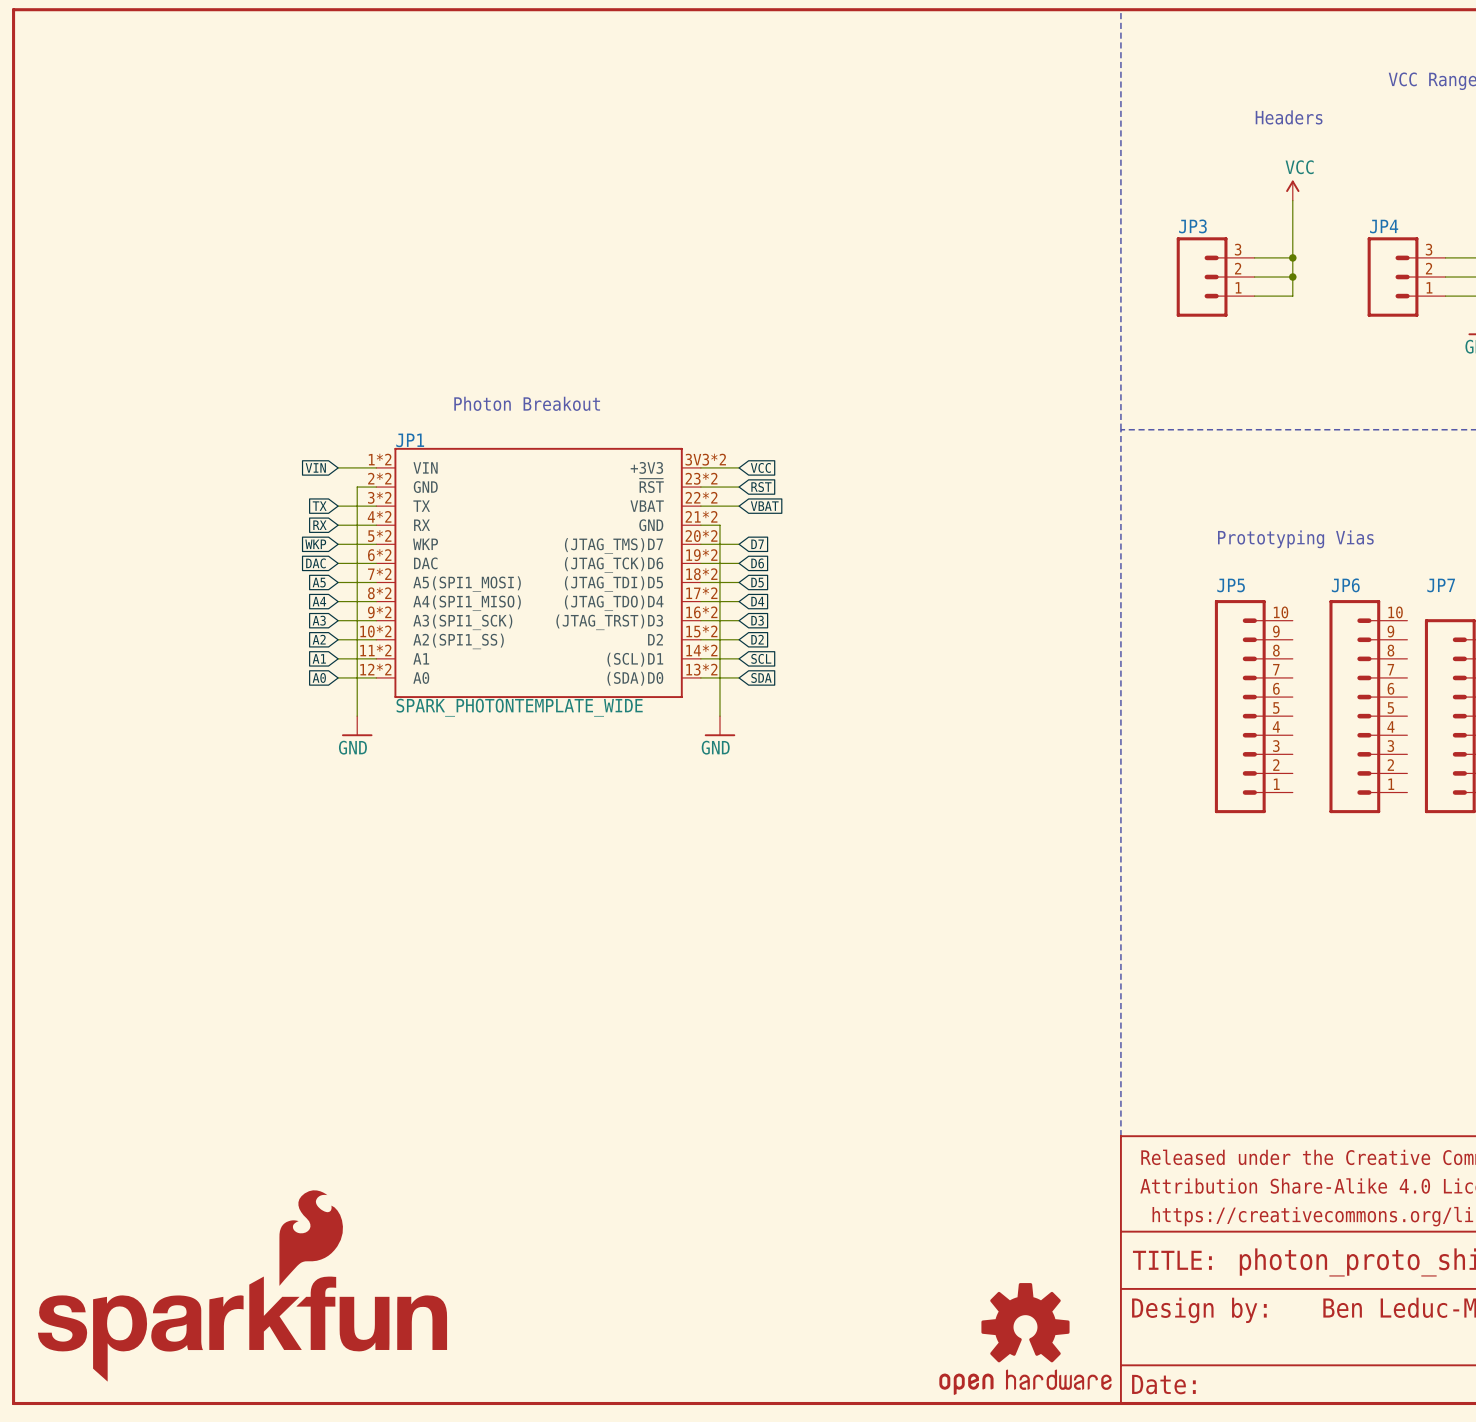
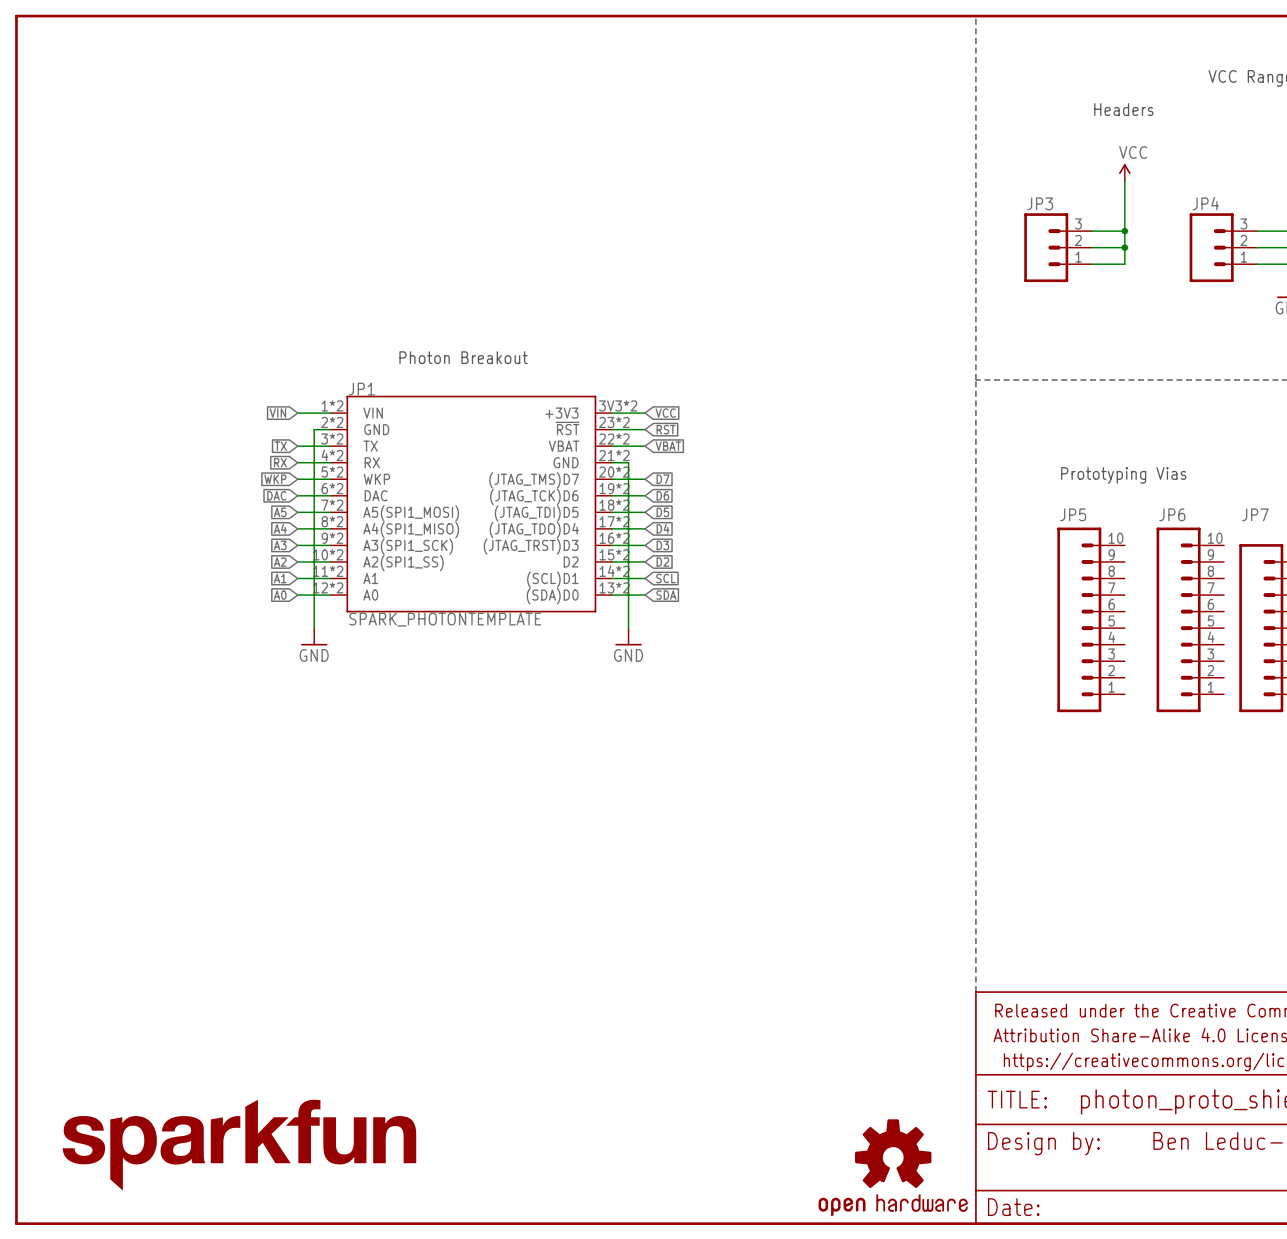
JP1 value: SPARK_PHOTONTEMPLATE_WIDE (519, 707) -> SPARK_PHOTONTEMPLATE (445, 619)
part: (242, 1285) -> none
part: none -> (239, 1145)

